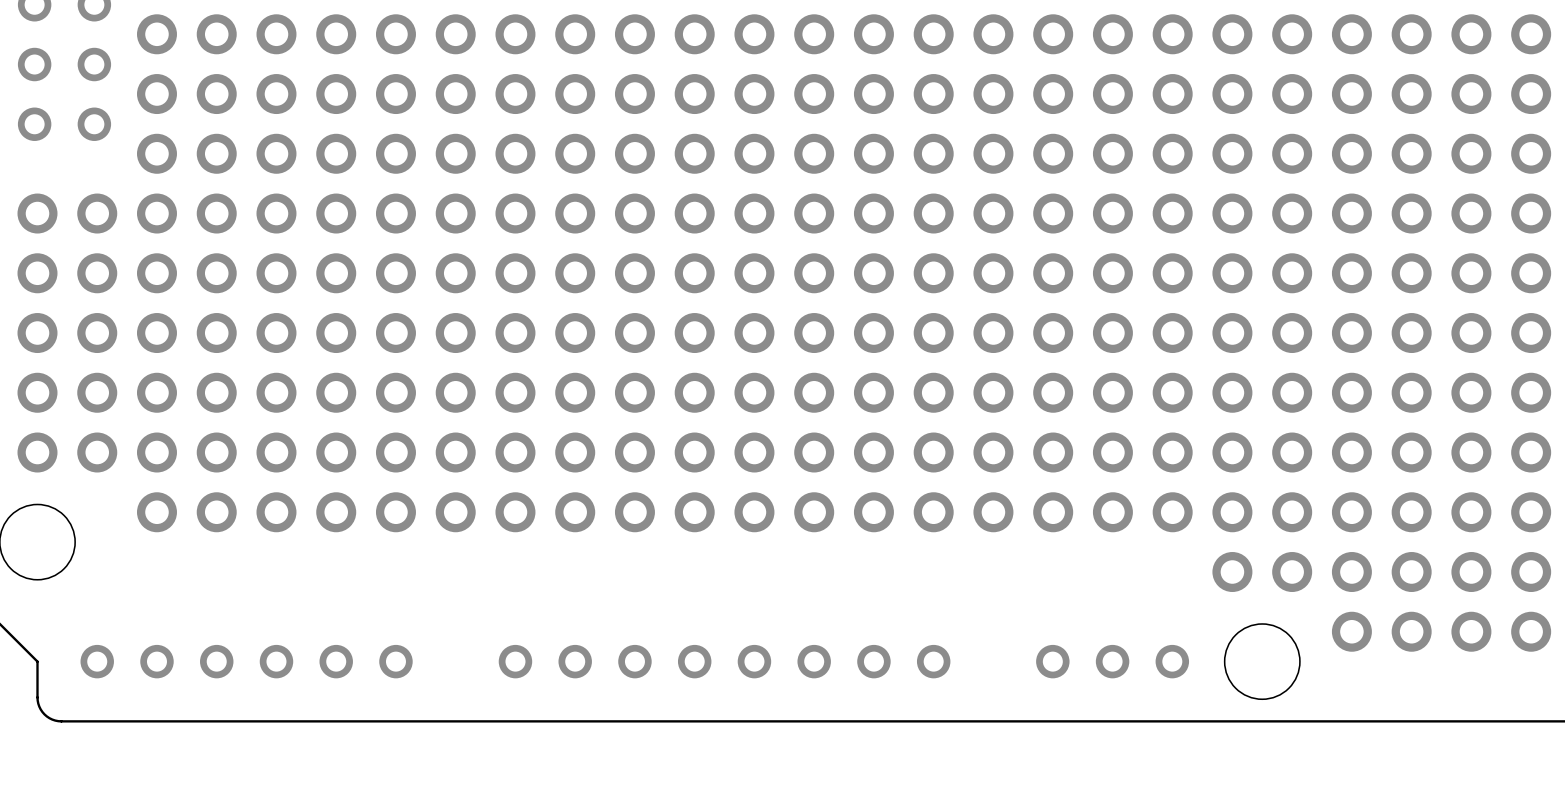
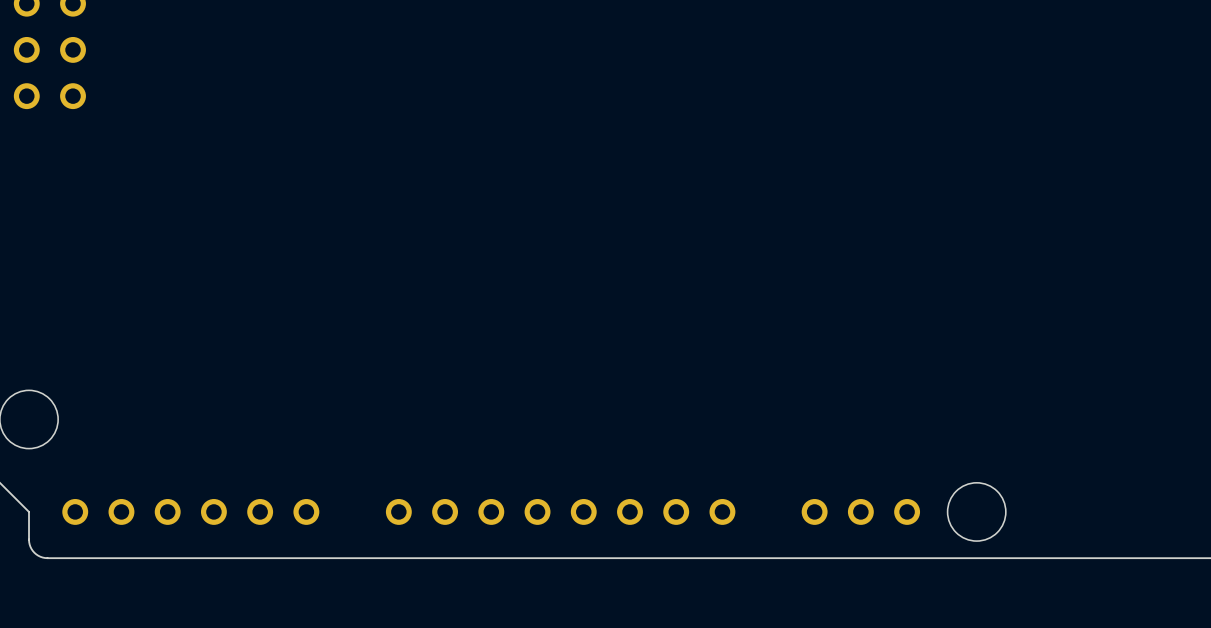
part: (844, 34) -> none
part: (844, 94) -> none
part: (844, 153) -> none
part: (784, 213) -> none
part: (784, 273) -> none
part: (784, 333) -> none
part: (784, 392) -> none
part: (784, 452) -> none
part: (844, 512) -> none
part: (1381, 572) -> none
part: (1441, 631) -> none

